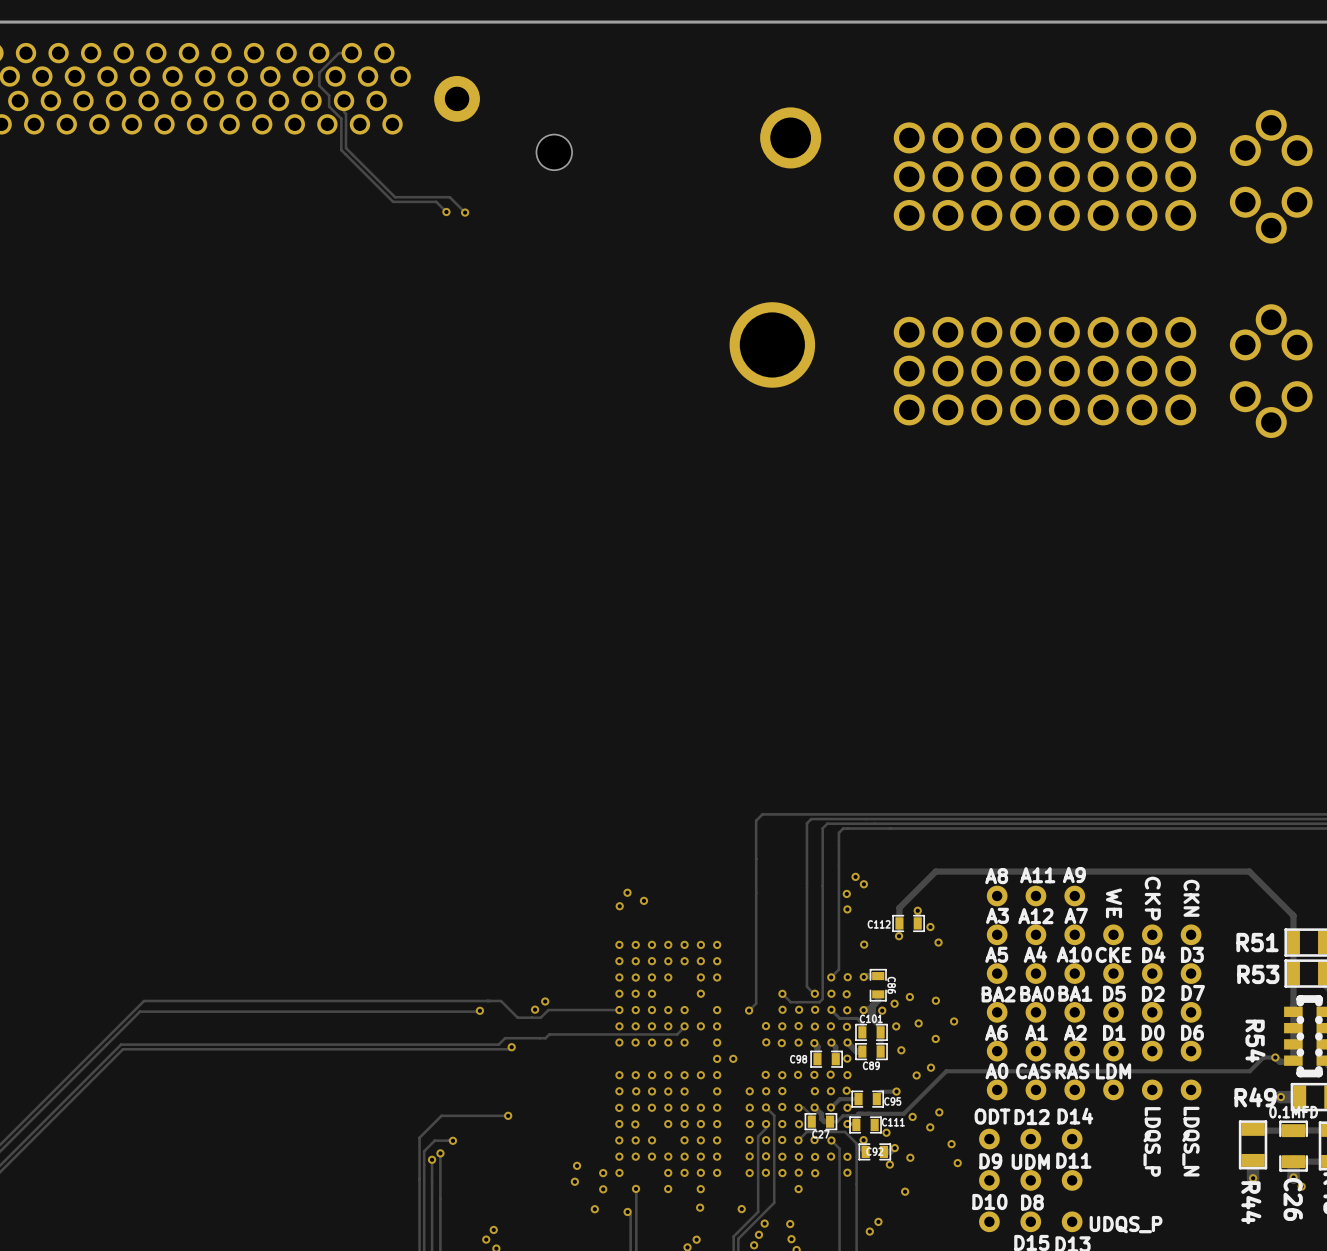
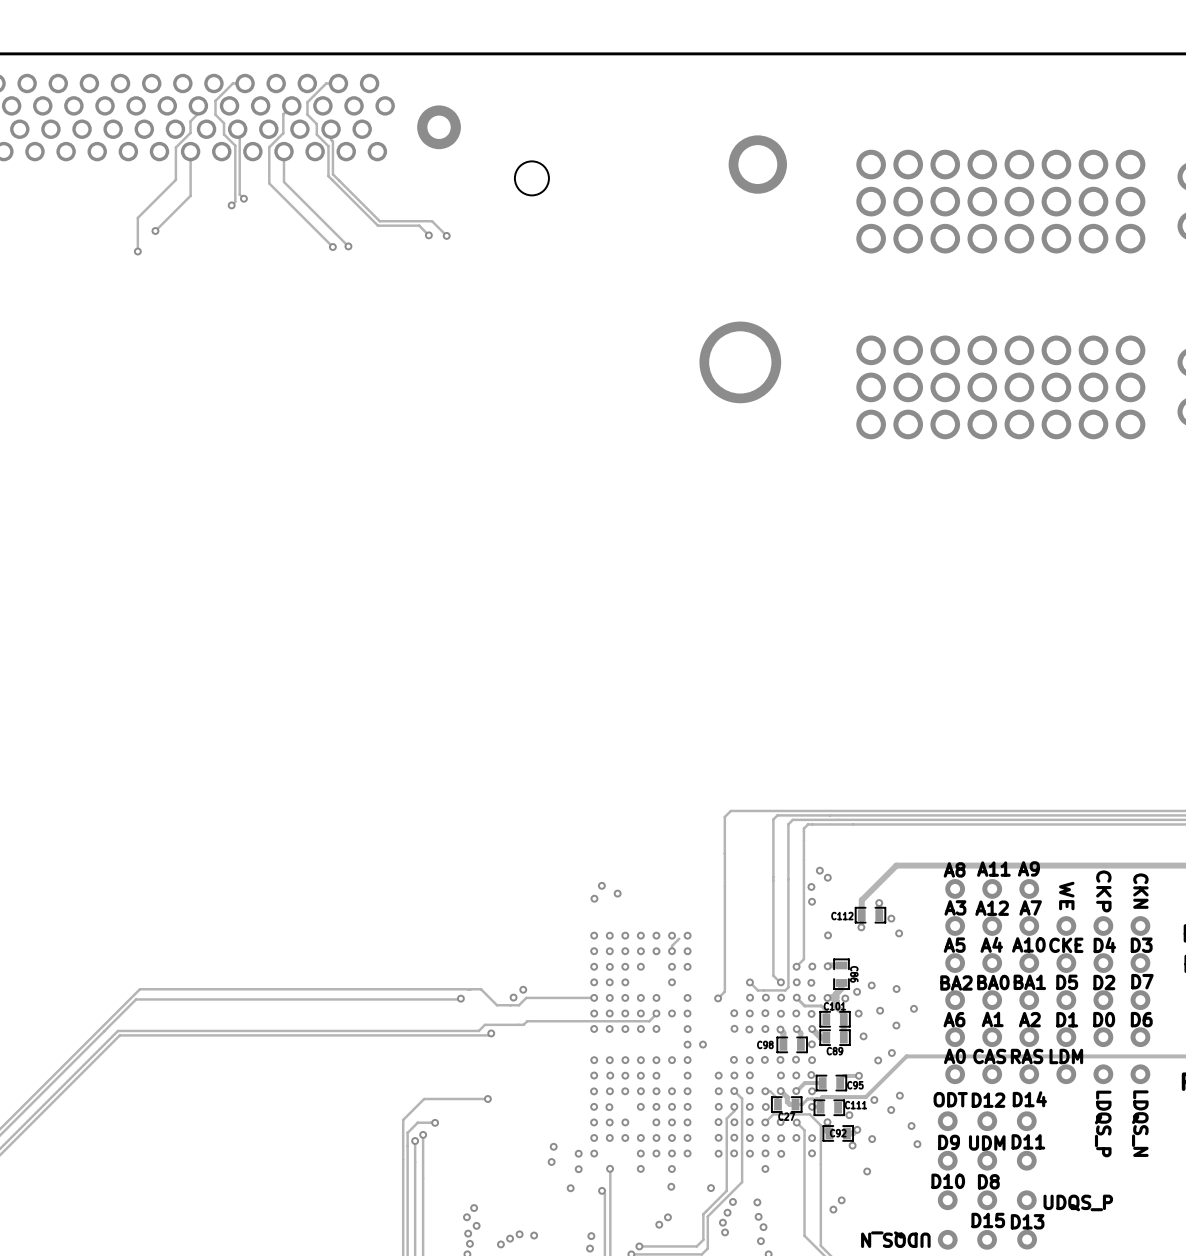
track: none -> (245, 83) (232, 83) (215, 100) (215, 114) (224, 123) (224, 134) (235, 145) (235, 201) (231, 205)
track: none -> (198, 105) (198, 113) (190, 121) (190, 132) (175, 147) (175, 179) (137, 217) (137, 251)
track: none -> (291, 105) (283, 114) (283, 133) (269, 147) (269, 183) (332, 247)
track: none -> (237, 129) (239, 131) (239, 194) (243, 198)
track: none -> (190, 151) (190, 195) (155, 231)
track: none -> (283, 151) (283, 181) (348, 246)
via: none -> (243, 198)
via: none -> (231, 205)
via: none -> (155, 231)
via: none -> (348, 246)
via: none -> (332, 247)
via: none -> (137, 251)
track: none -> (679, 938) (672, 945) (672, 951)

